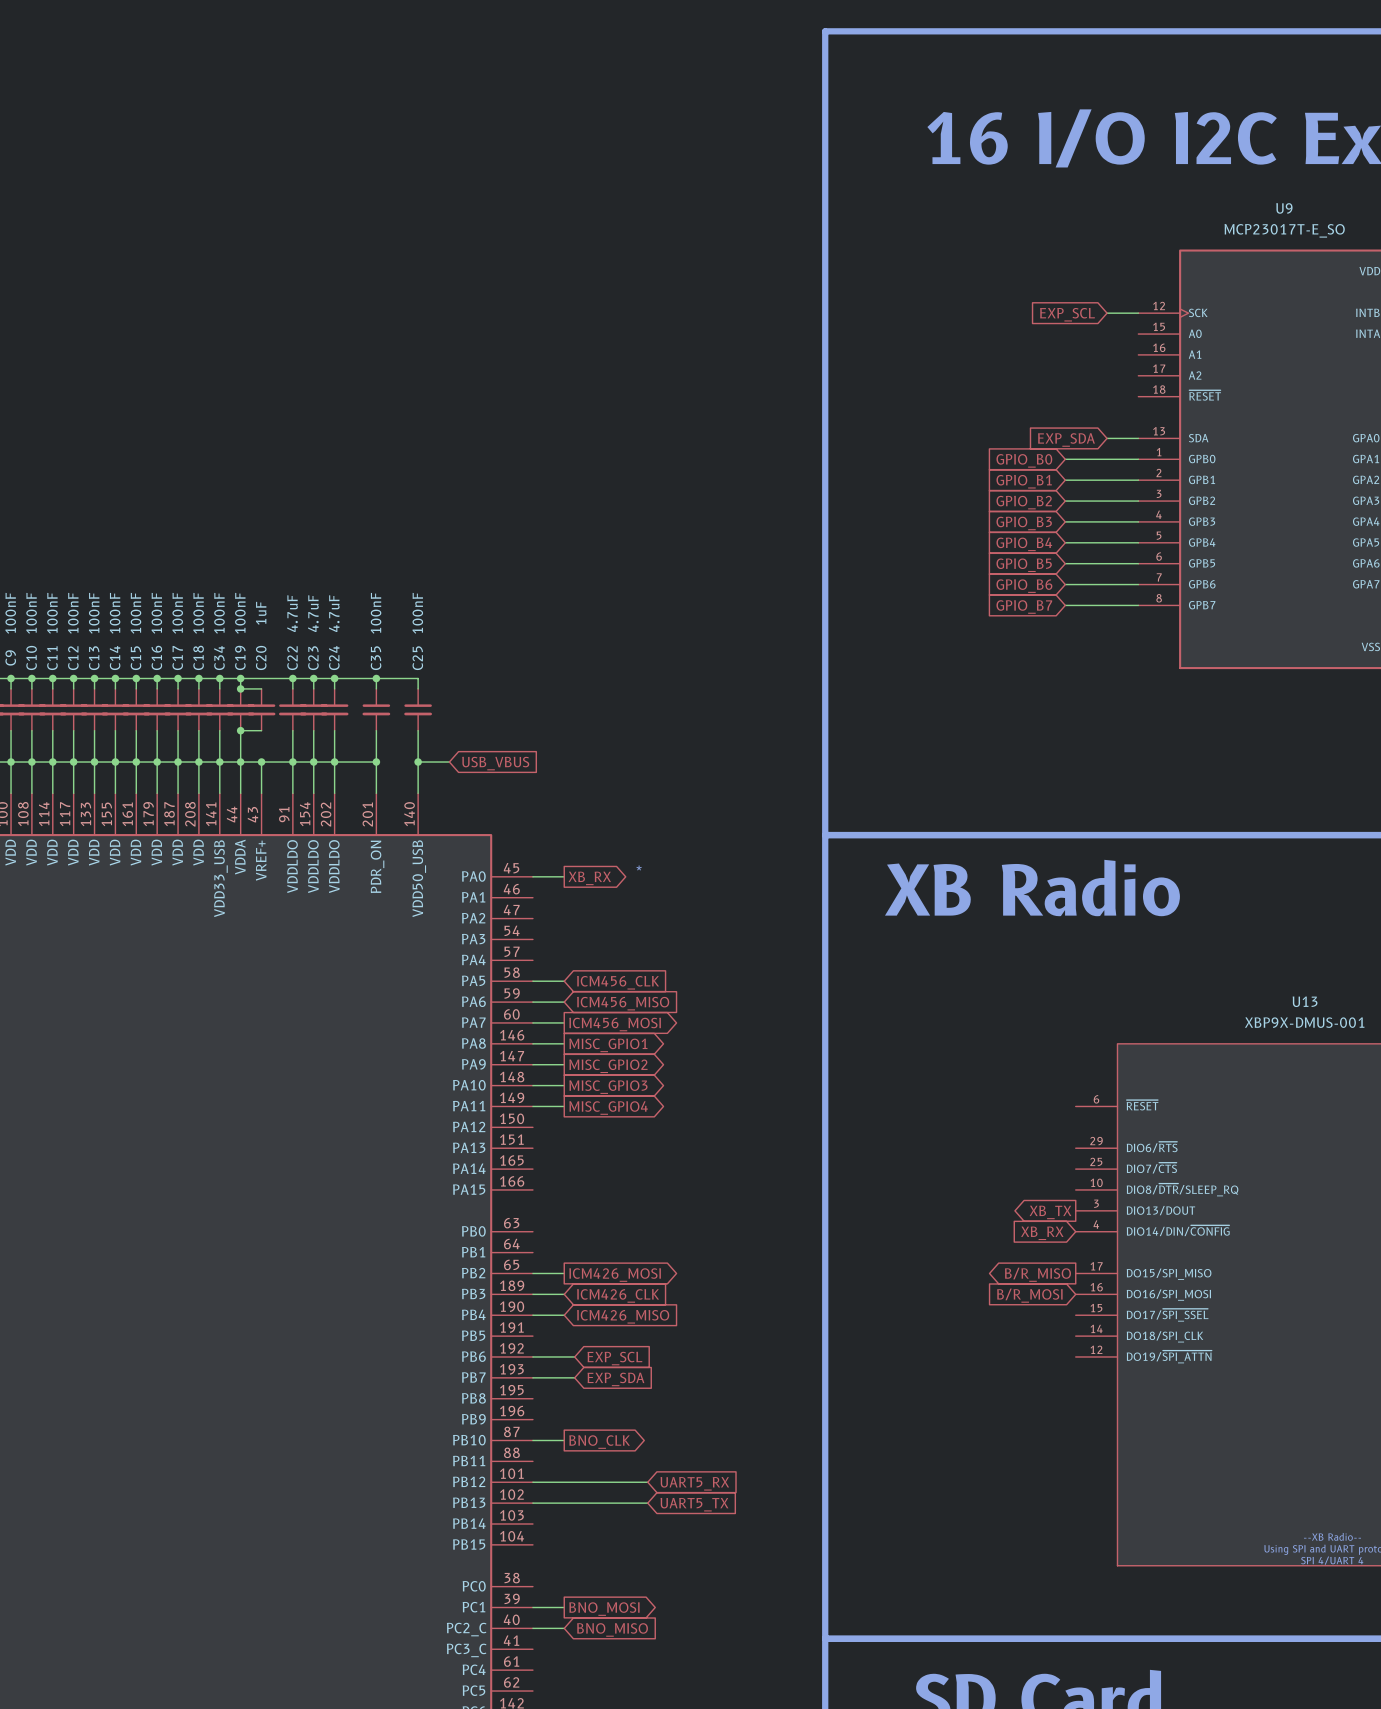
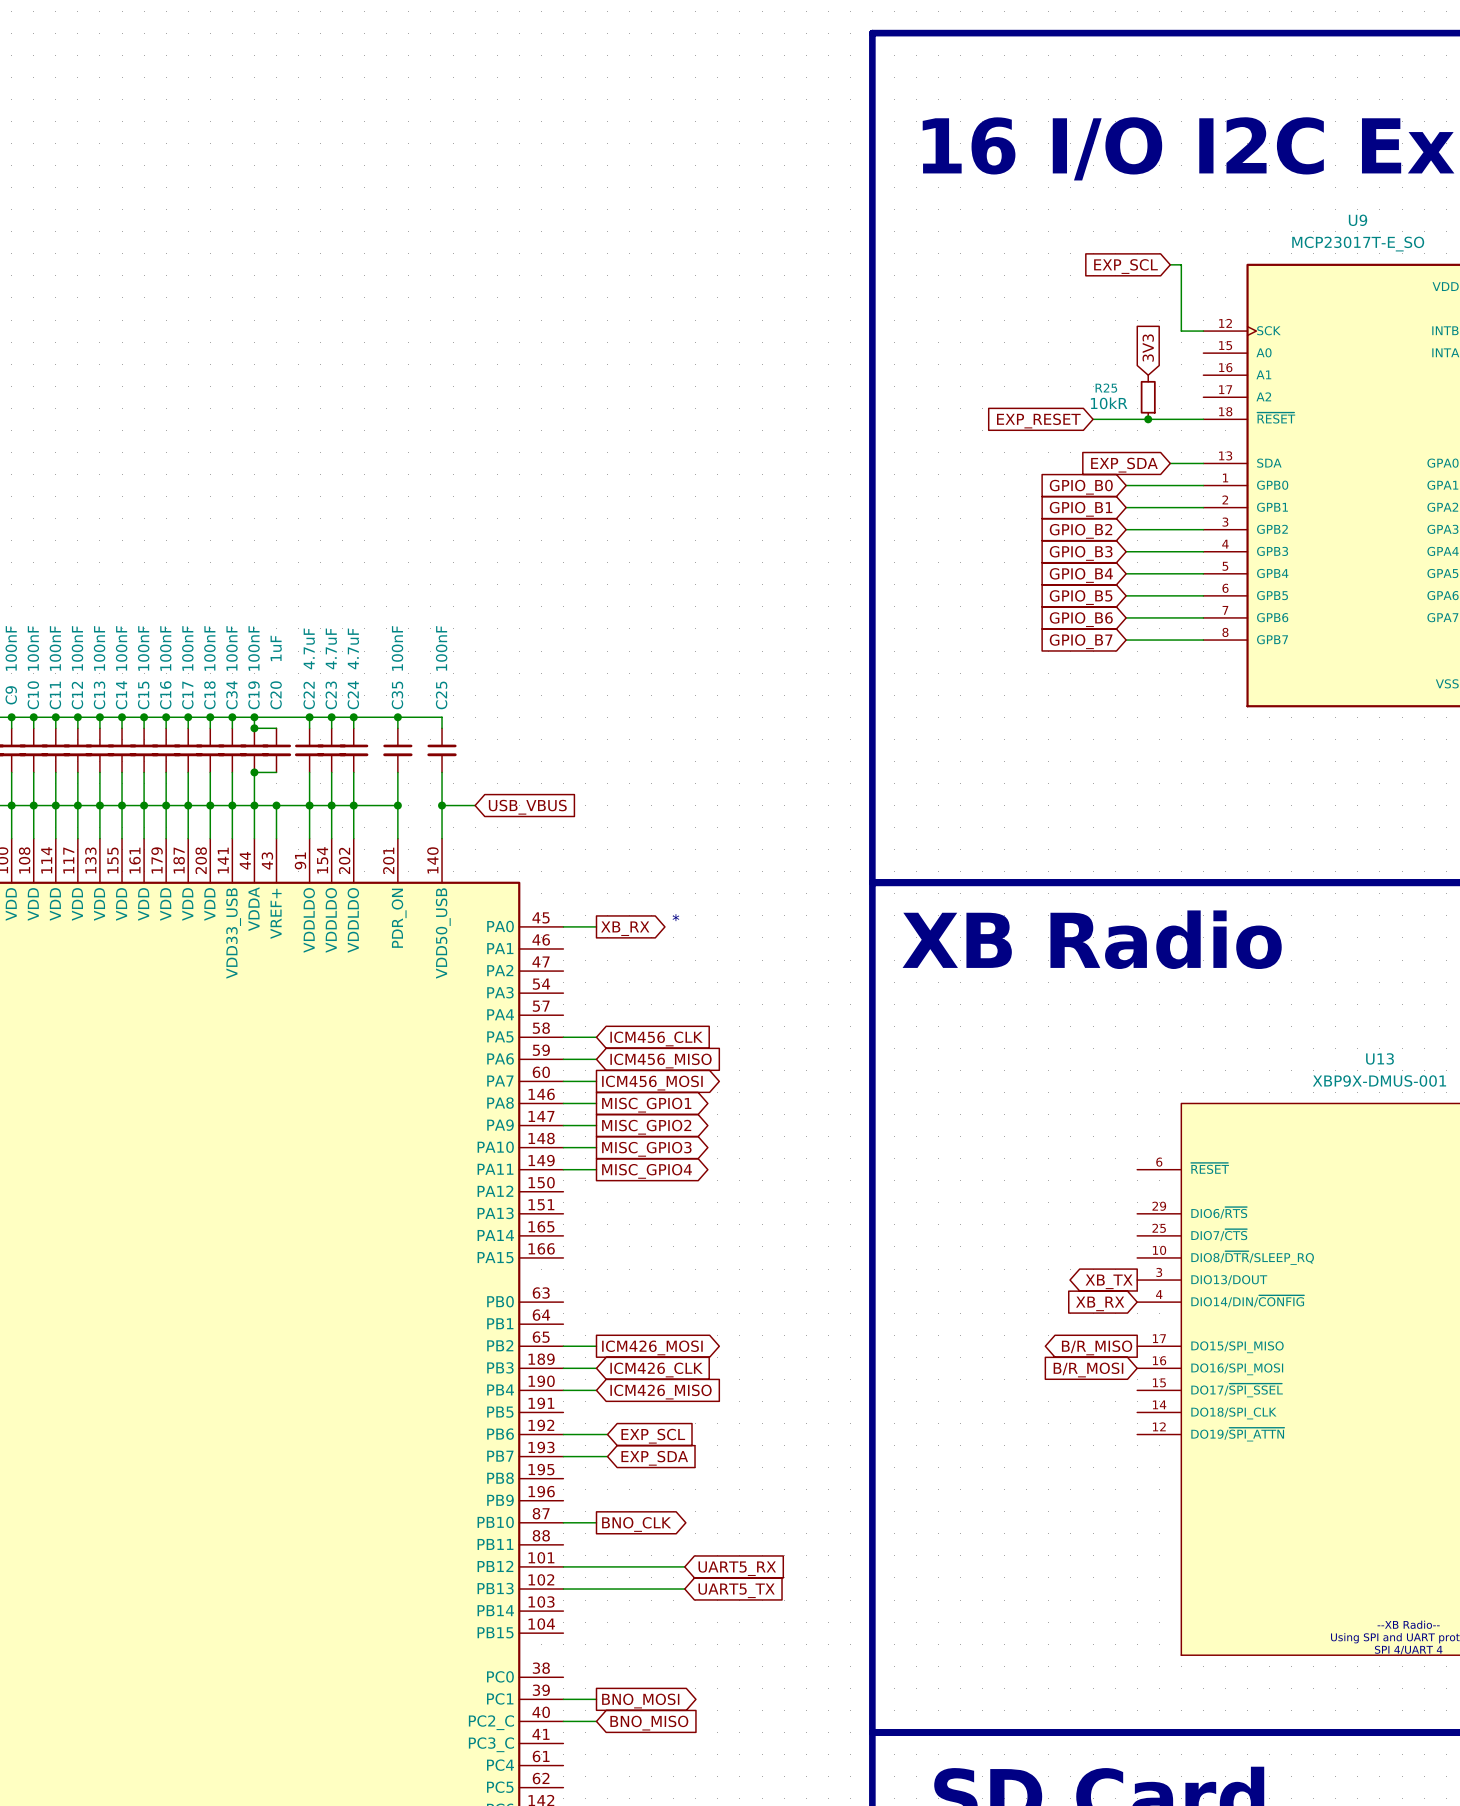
wire: (1107, 313) (1117, 313) -> (1170, 264) (1181, 264) (1181, 331)
global label position: EXP_SCL (1067, 314) -> EXP_SCL (1125, 266)
global label: none -> 3V3 (1148, 348)
R25: none -> 10kR (1148, 397)
wire: none -> (1093, 419) (1203, 419)
junction: none -> (1148, 419)
global label: none -> EXP_RESET (1038, 421)

